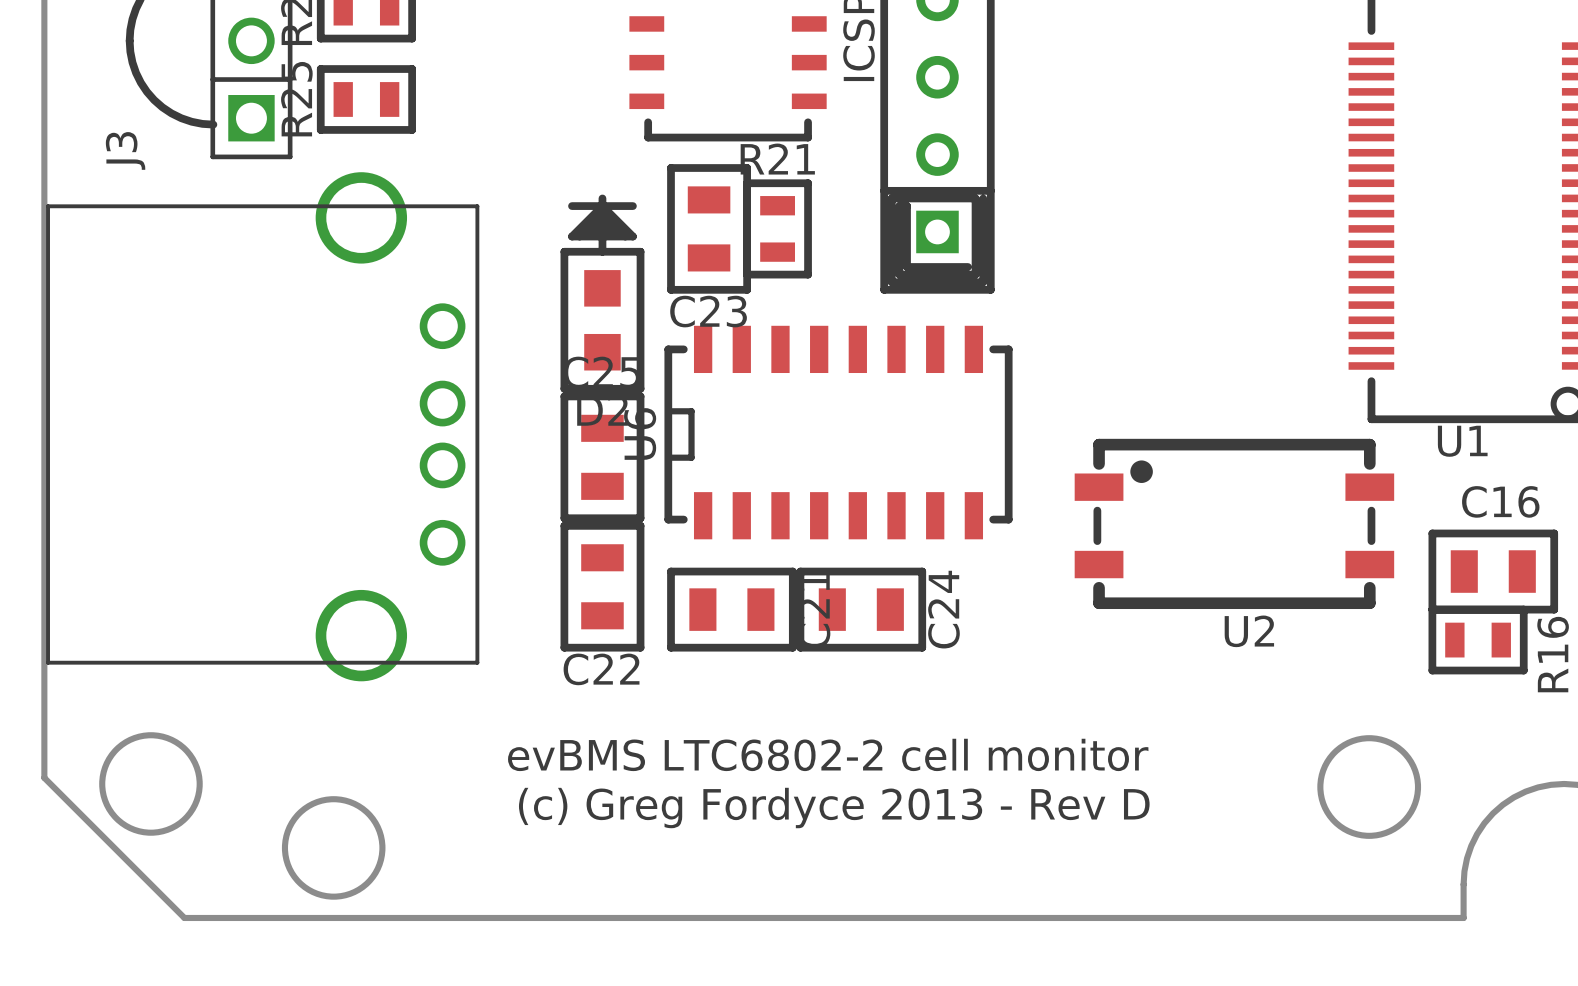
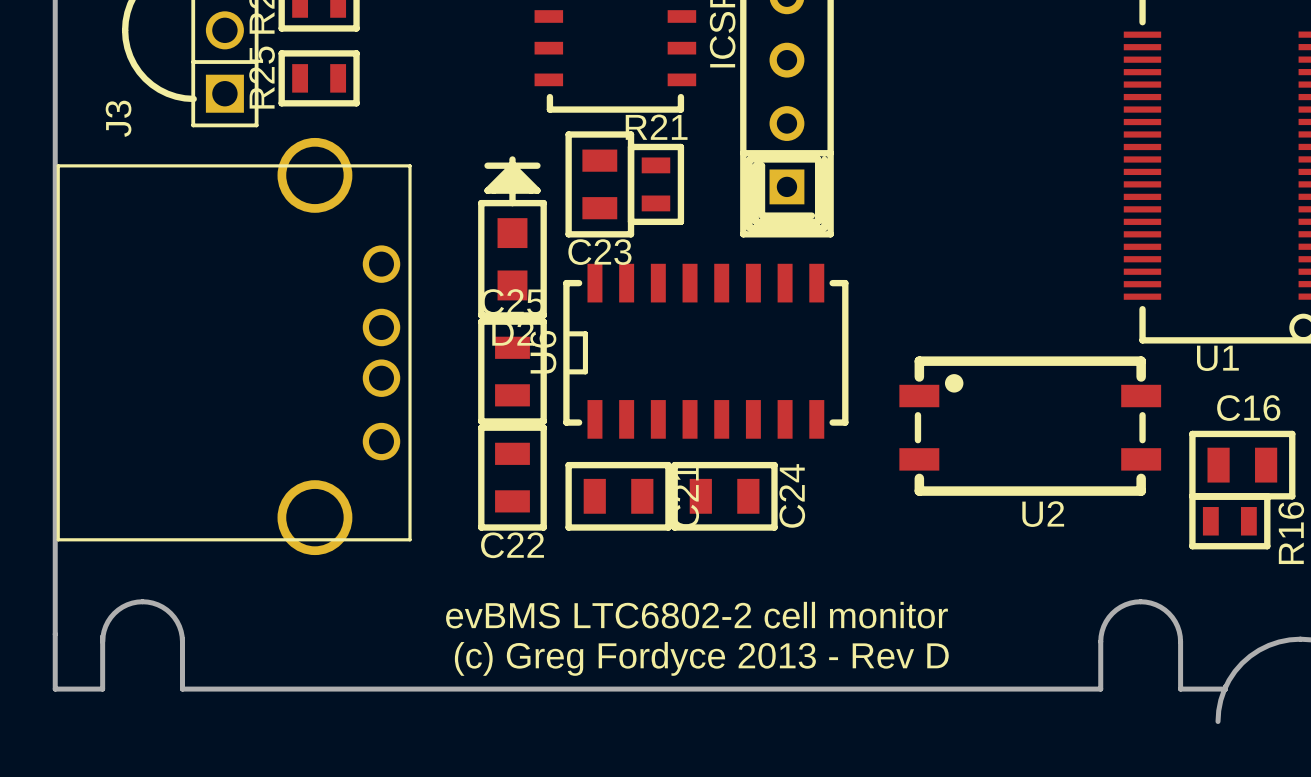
drawing: [99, 732, 203, 836] -> none
drawing: [1317, 735, 1422, 839] -> none
line: (44, 777) (184, 917) (1463, 917) (1463, 884) -> (55, 634) (55, 689) (102, 689) (102, 636)
line: none -> (182, 639) (182, 689) (1100, 689) (1100, 641) (1103, 626) (1112, 613) (1120, 607) (1140, 601) (1155, 604) (1164, 609) (1177, 626) (1180, 641) (1180, 689) (1225, 689) (1225, 686)
line: none -> (102, 641) (105, 626) (114, 613) (127, 604) (142, 601) (157, 604) (170, 613) (179, 626) (182, 641)
drawing: [281, 796, 386, 900] -> none

